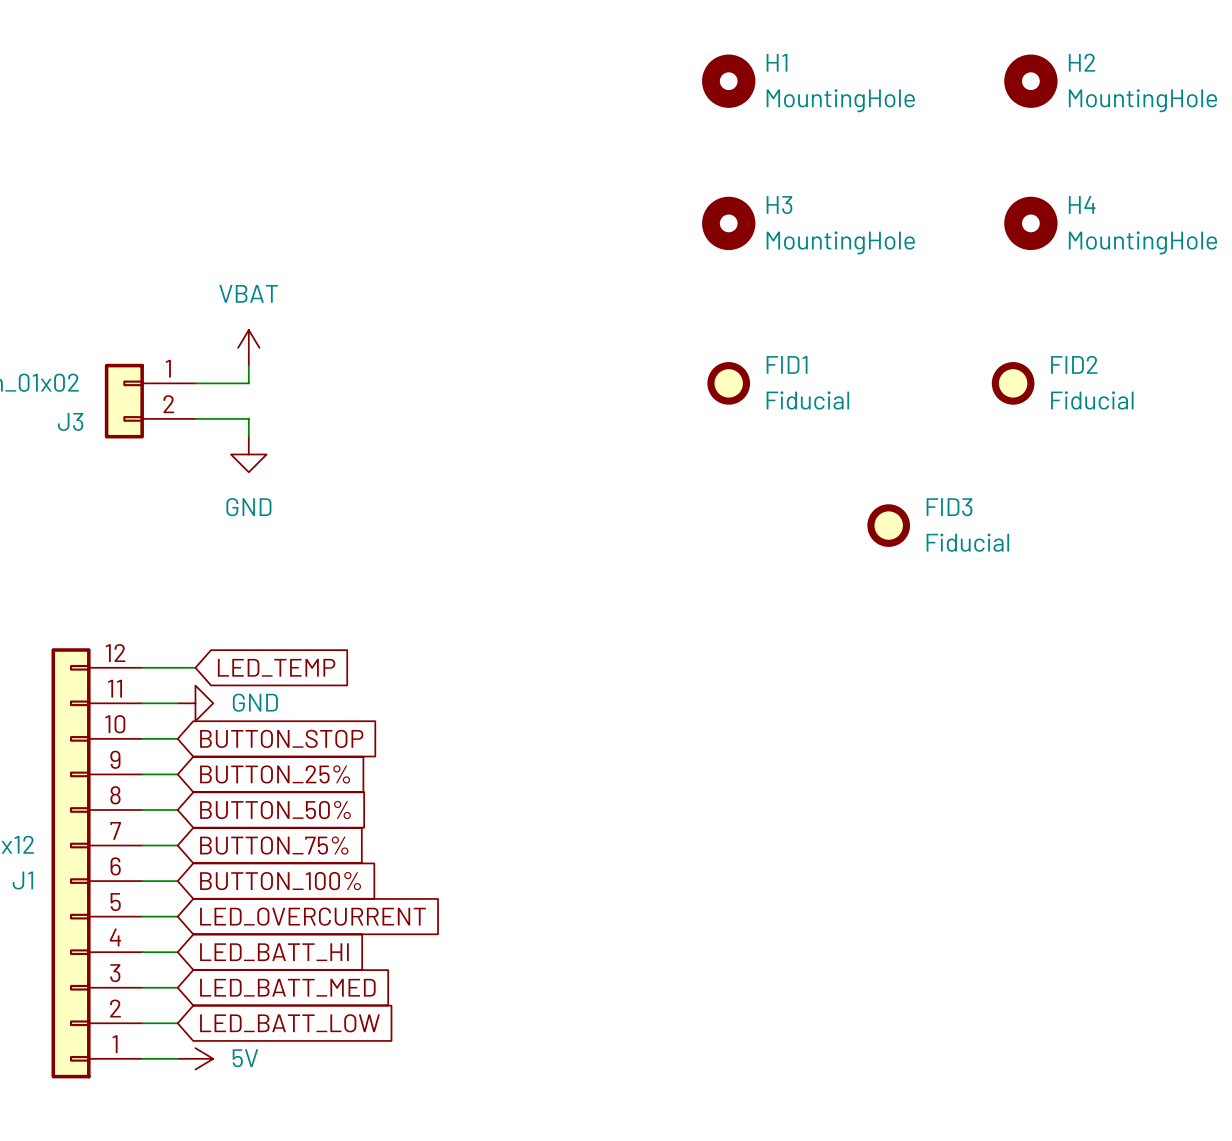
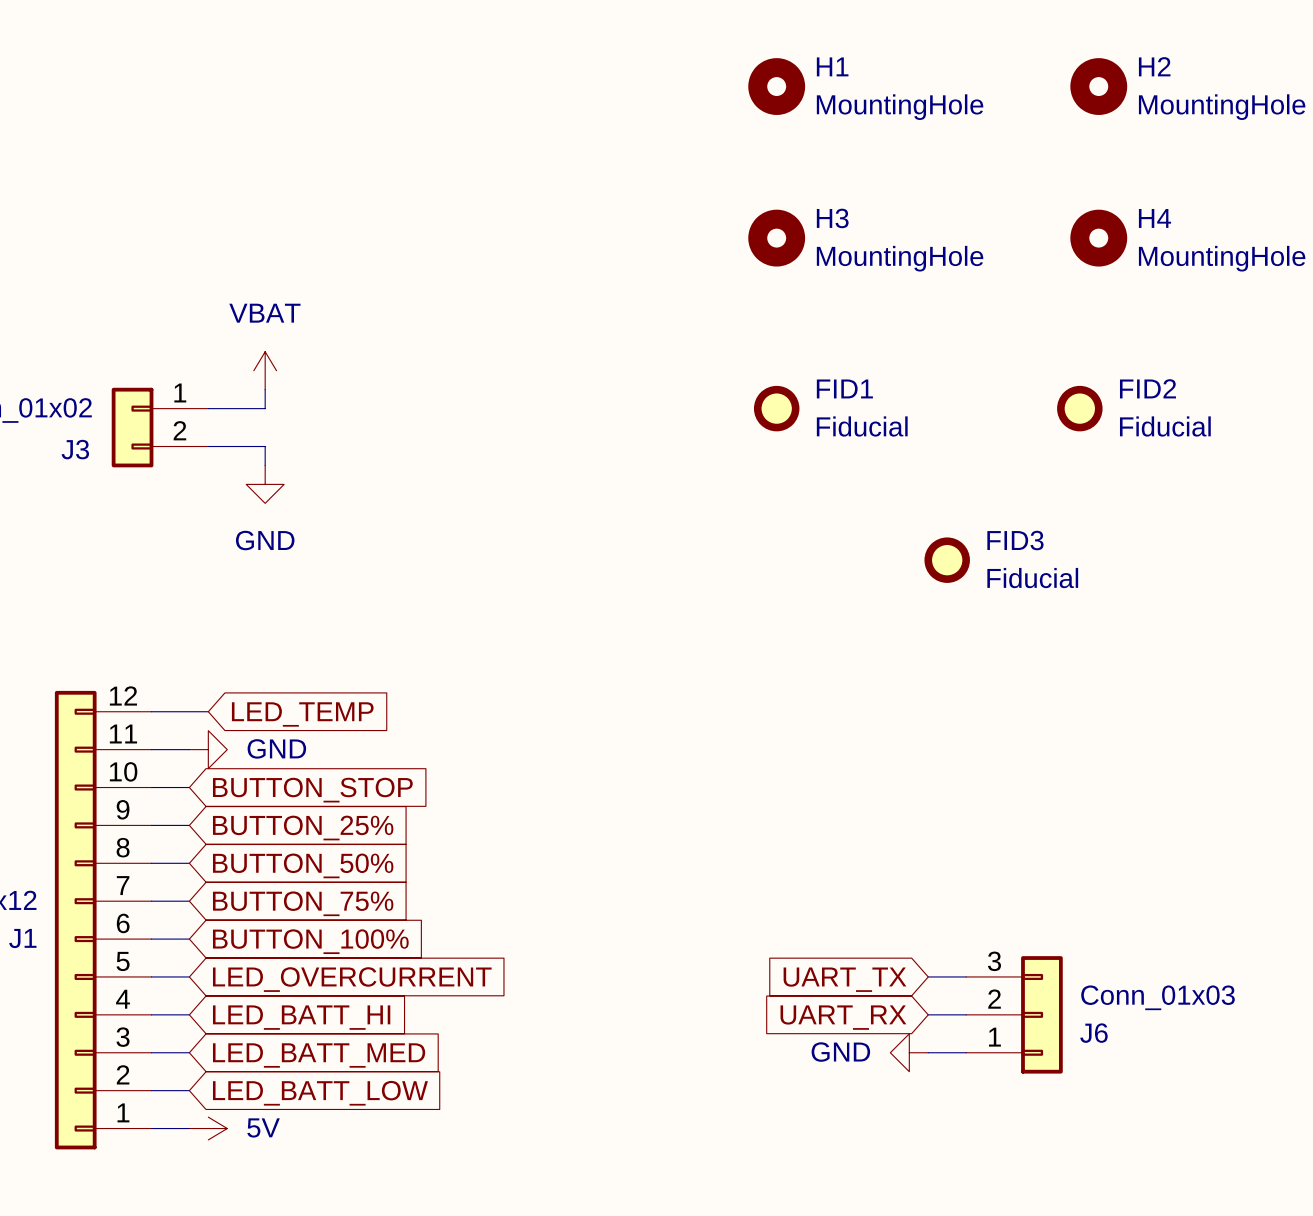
global label: none -> UART_TX (844, 979)
wire: none -> (928, 976) (966, 976)
global label: none -> UART_RX (843, 1017)
wire: none -> (928, 1014) (966, 1014)
J6: none -> Conn_01x03 (1014, 1014)
power symbol: none -> GND (909, 1052)
wire: none -> (928, 1052) (966, 1052)

